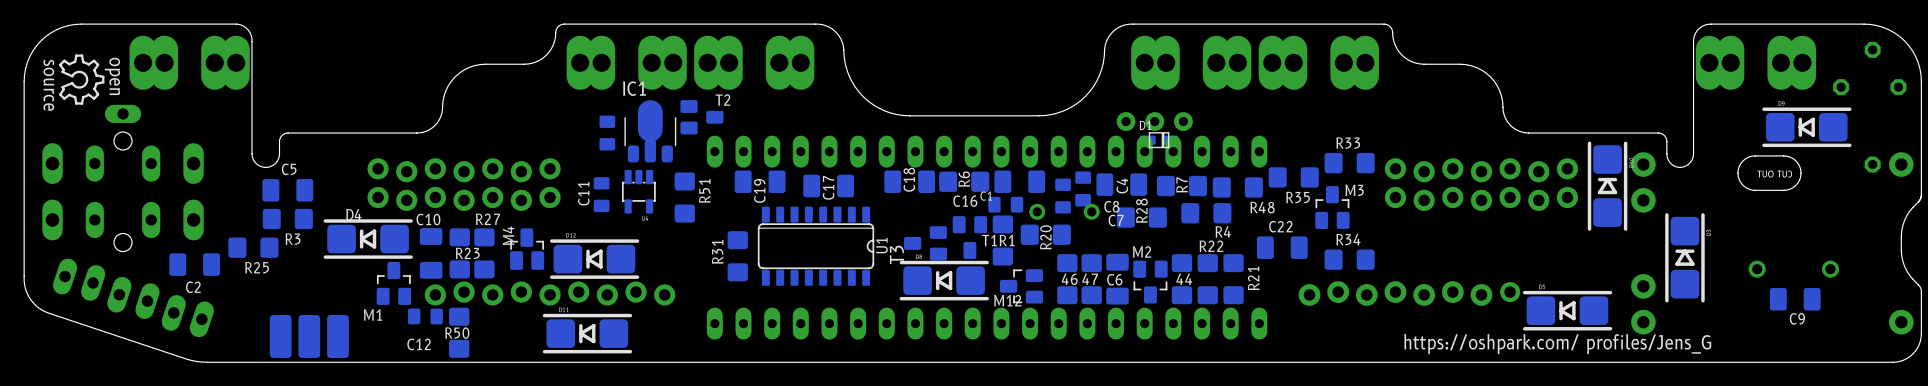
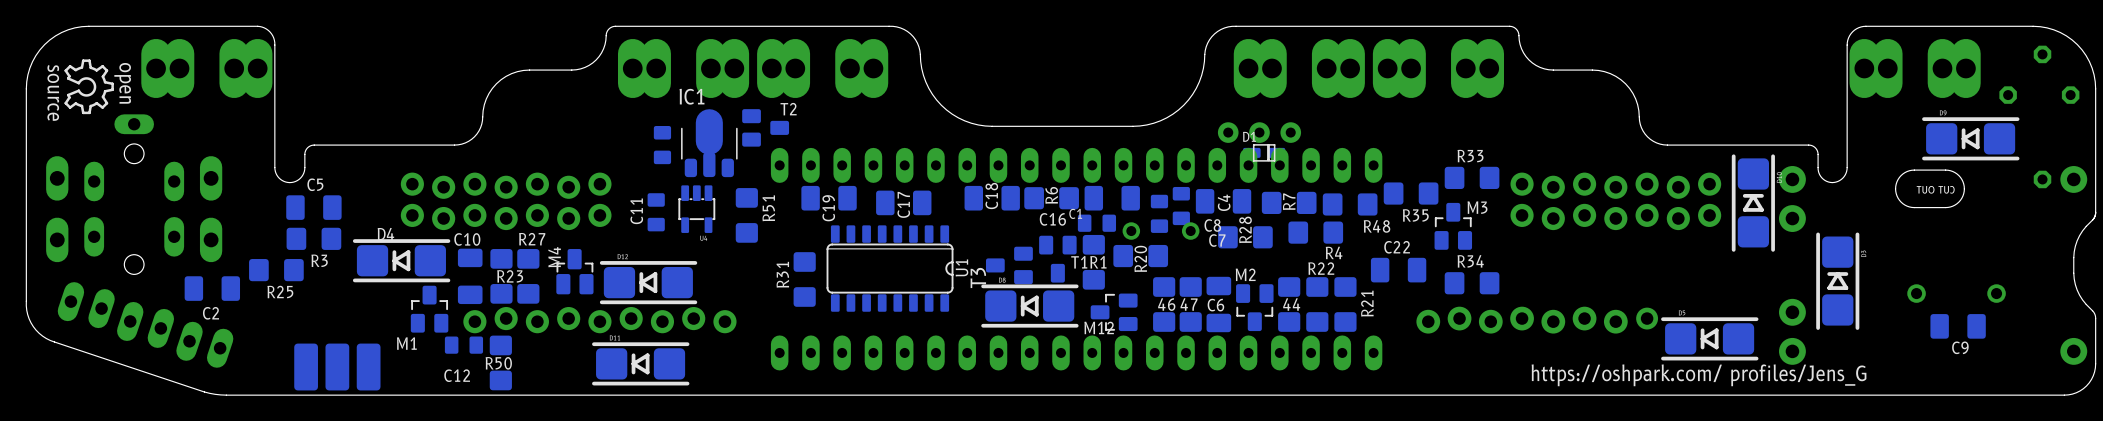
part footprint: [42, 104, 204, 252] -> [46, 114, 223, 275]

